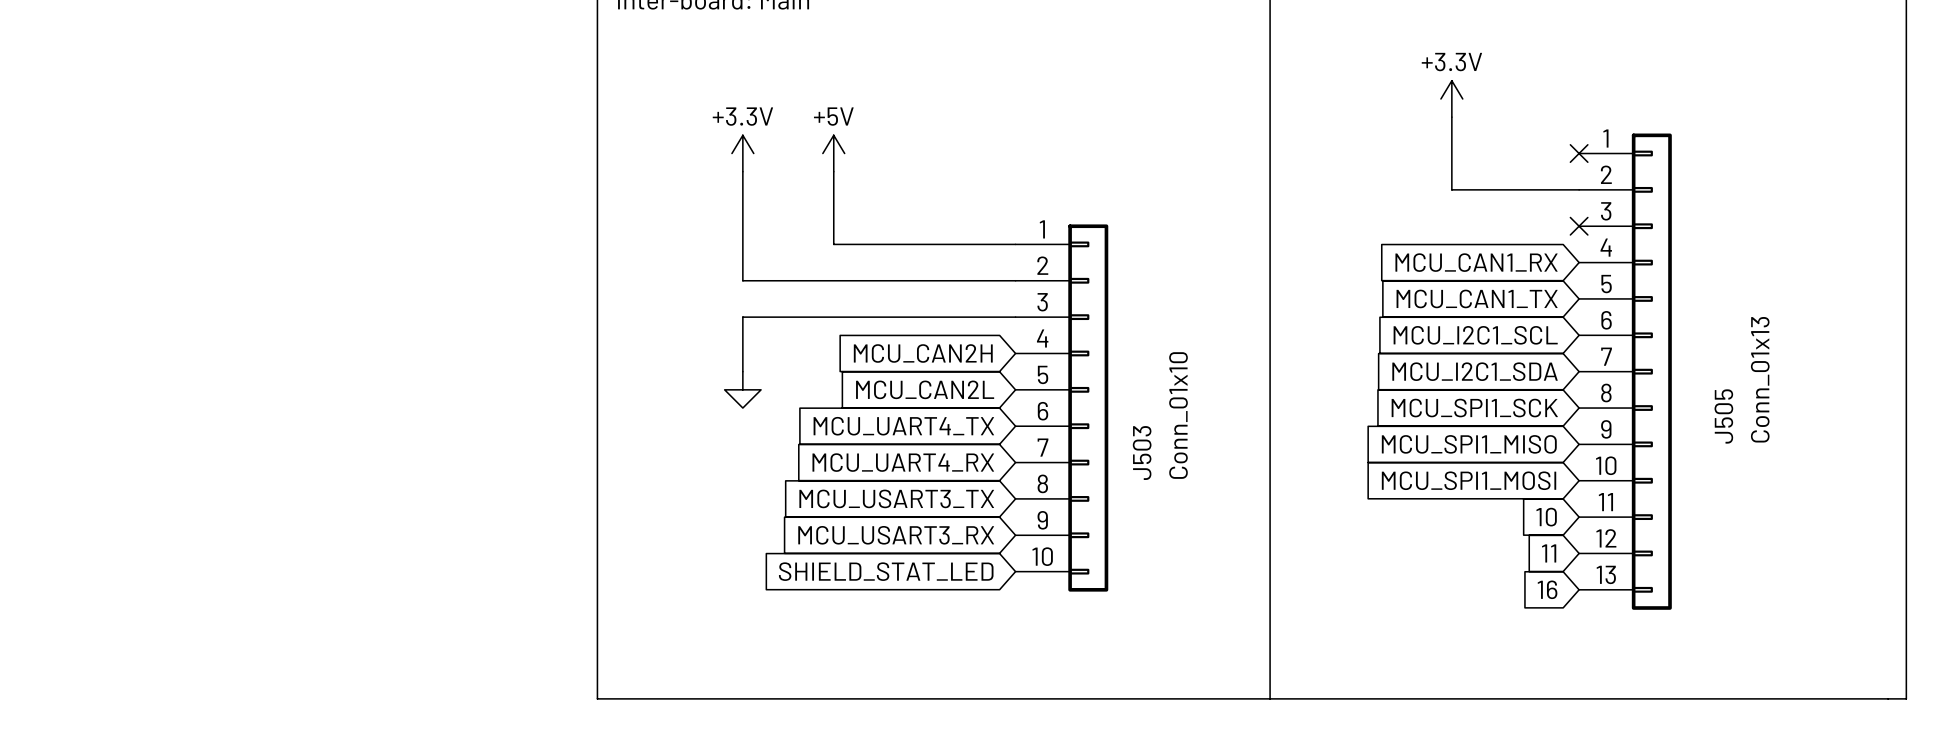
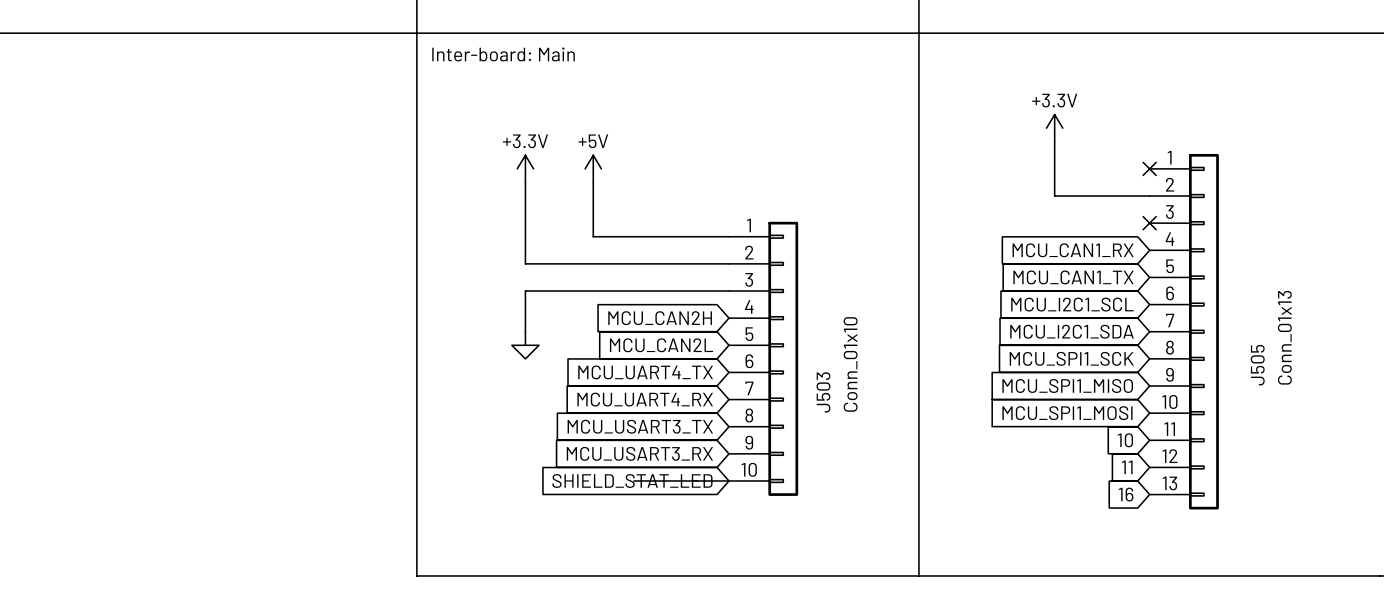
wire: none -> (633, 480) (728, 480)

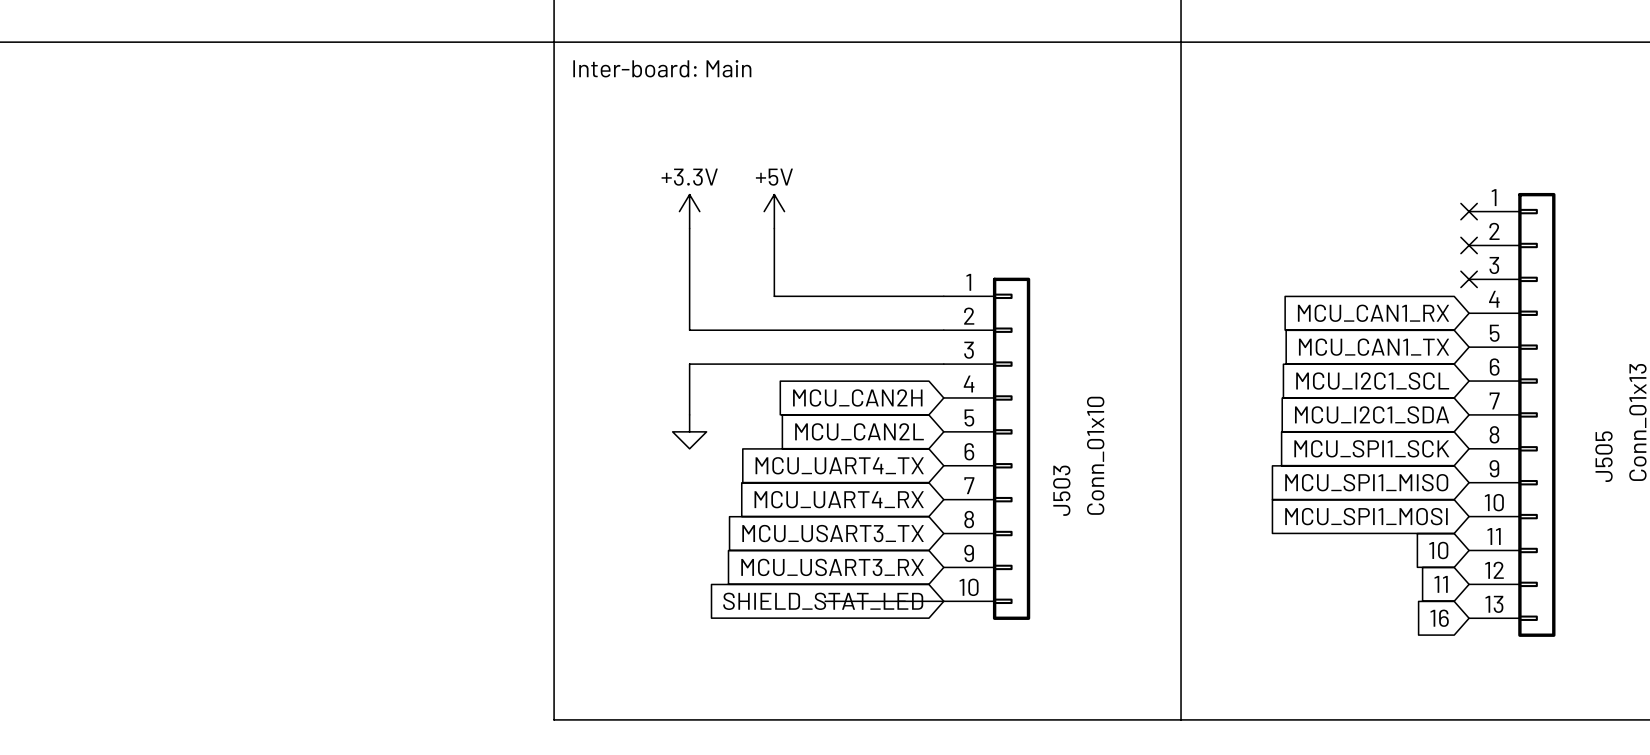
power symbol: +3.3V (1054, 128) -> none
wire: (1054, 141) (1054, 196) (1149, 196) -> none
no-connect mark: none -> (1469, 245)

